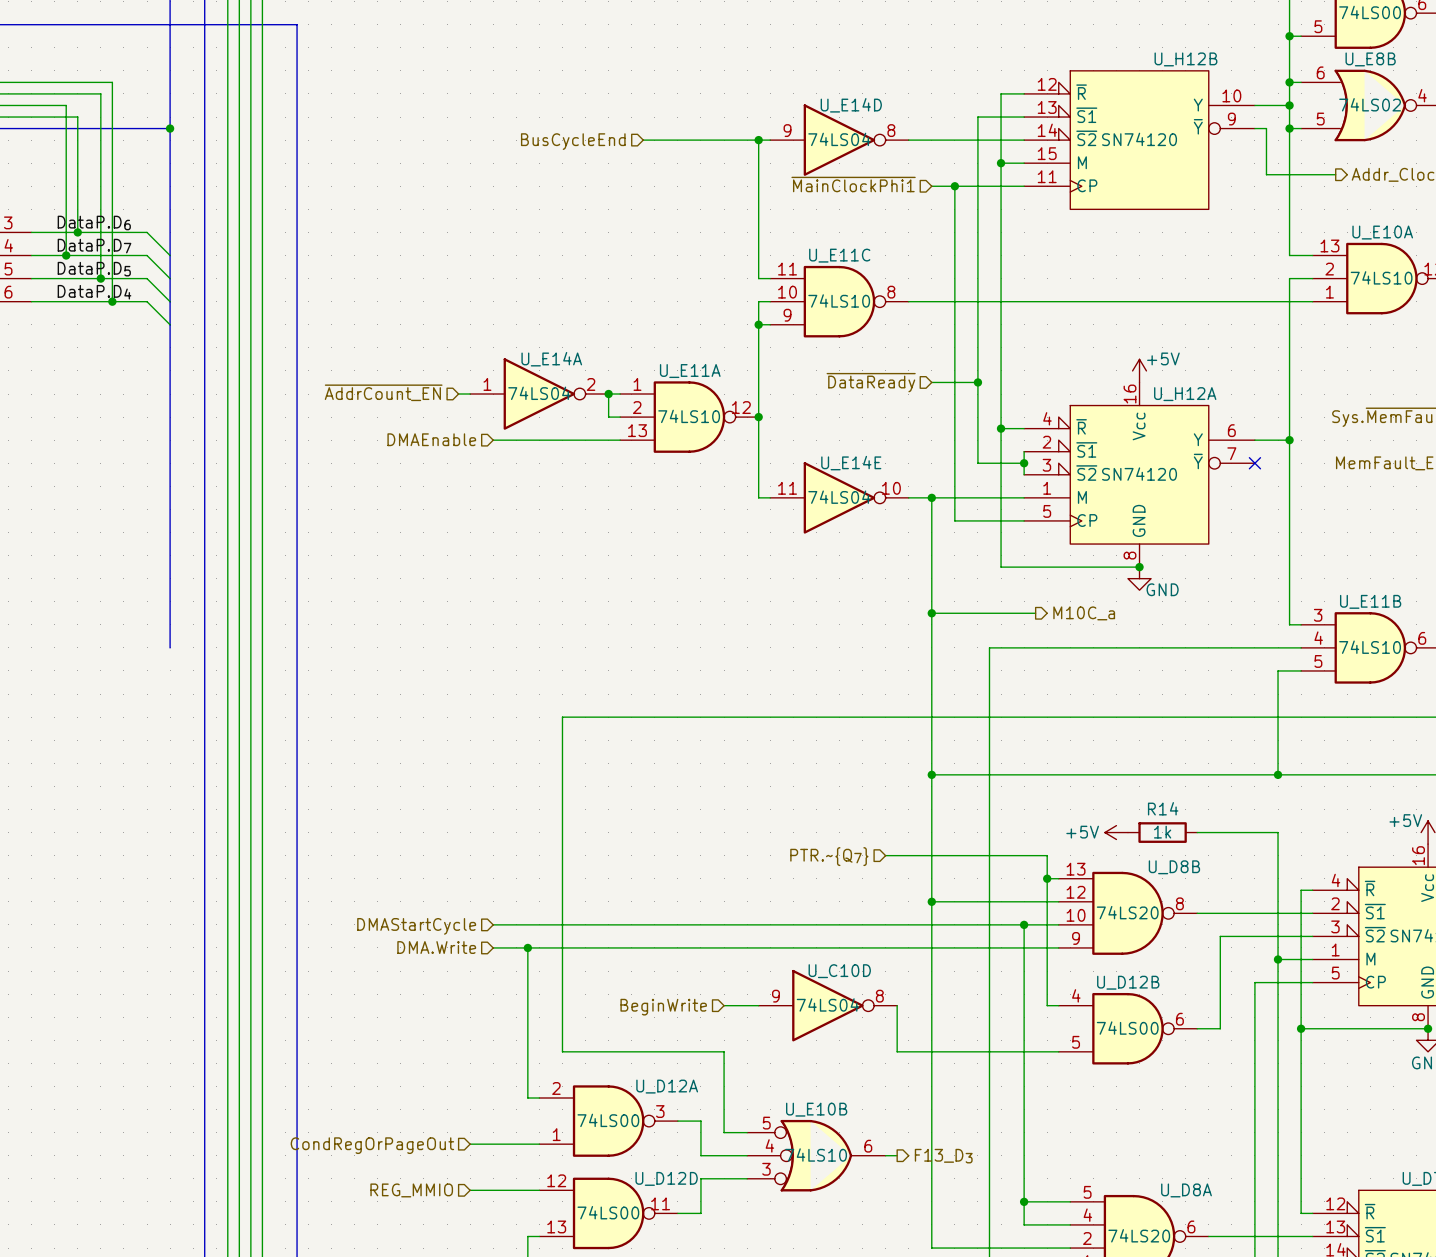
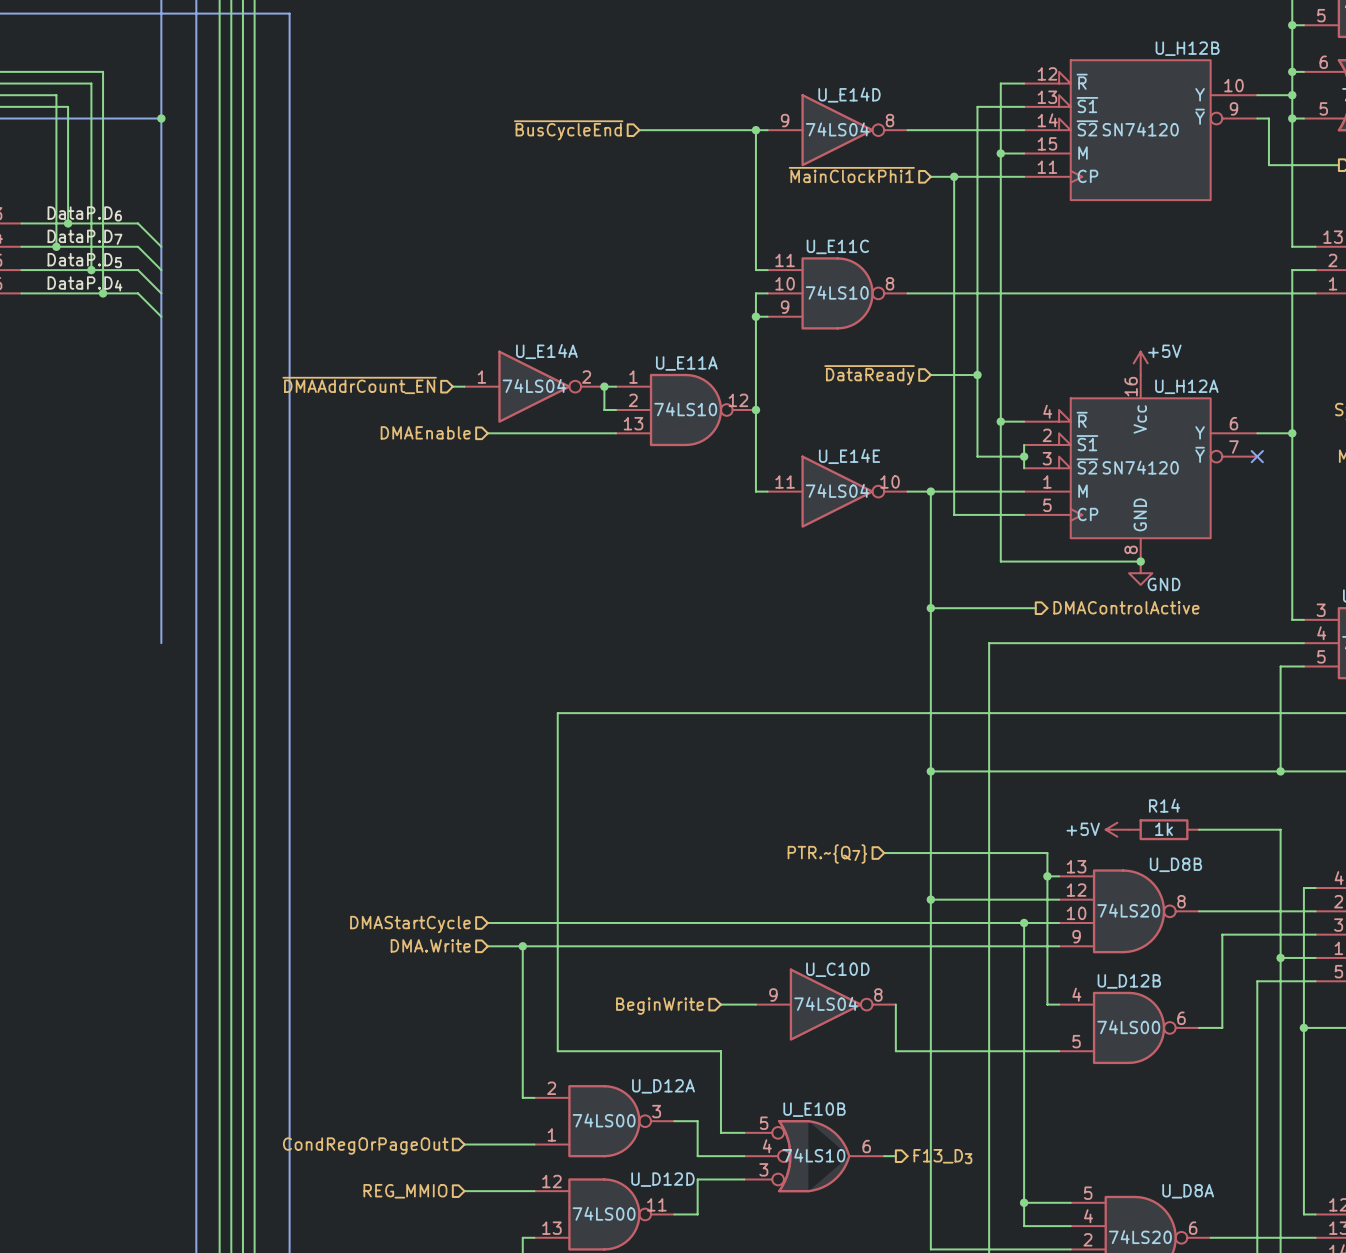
hierarchical label: BusCycleEnd (573, 141) -> ~{BusCycleEnd} (568, 130)
hierarchical label: ~{AddrCount_EN} (383, 392) -> ~{DMAAddrCount_EN} (359, 385)
hierarchical label: M10C_a (1084, 613) -> DMAControlActive (1126, 607)

